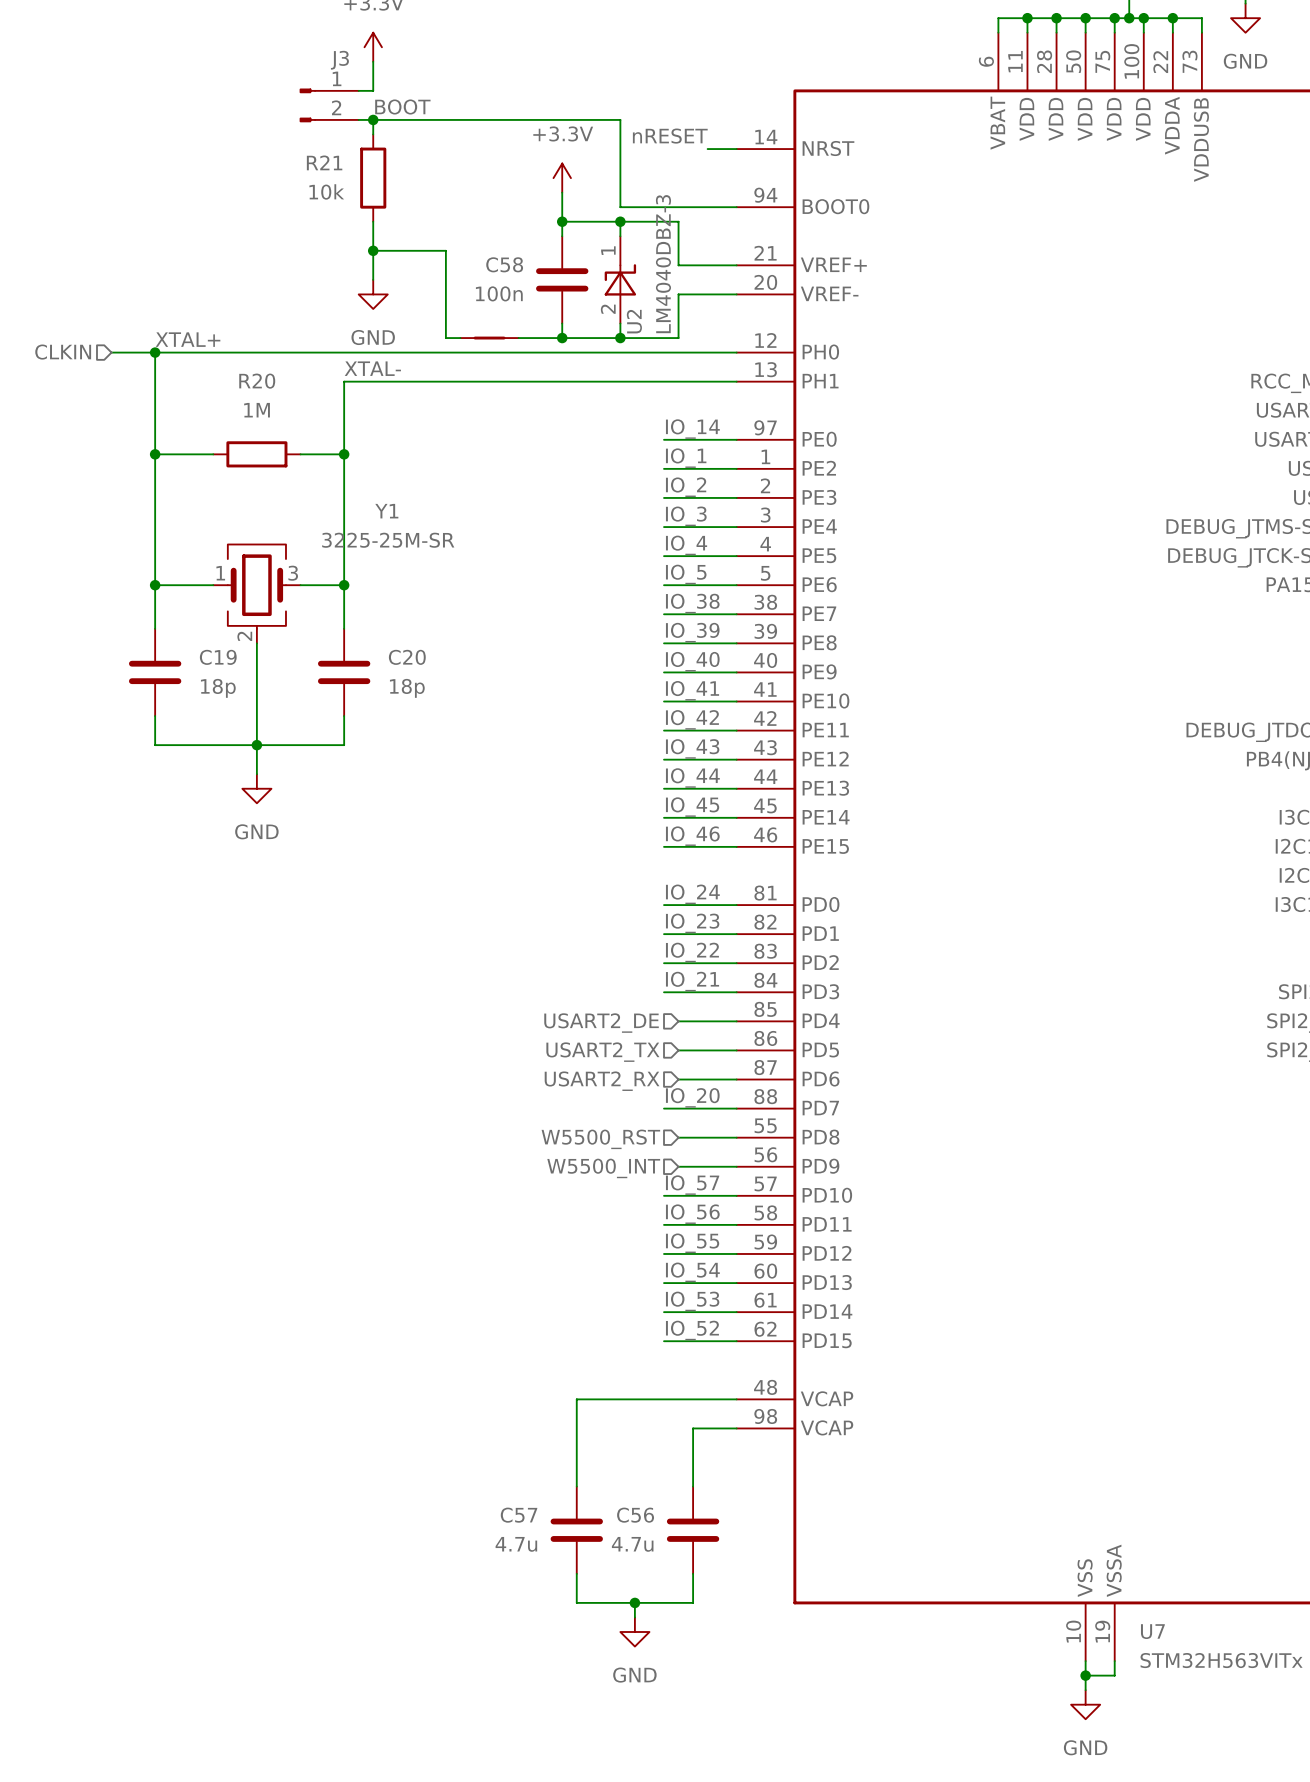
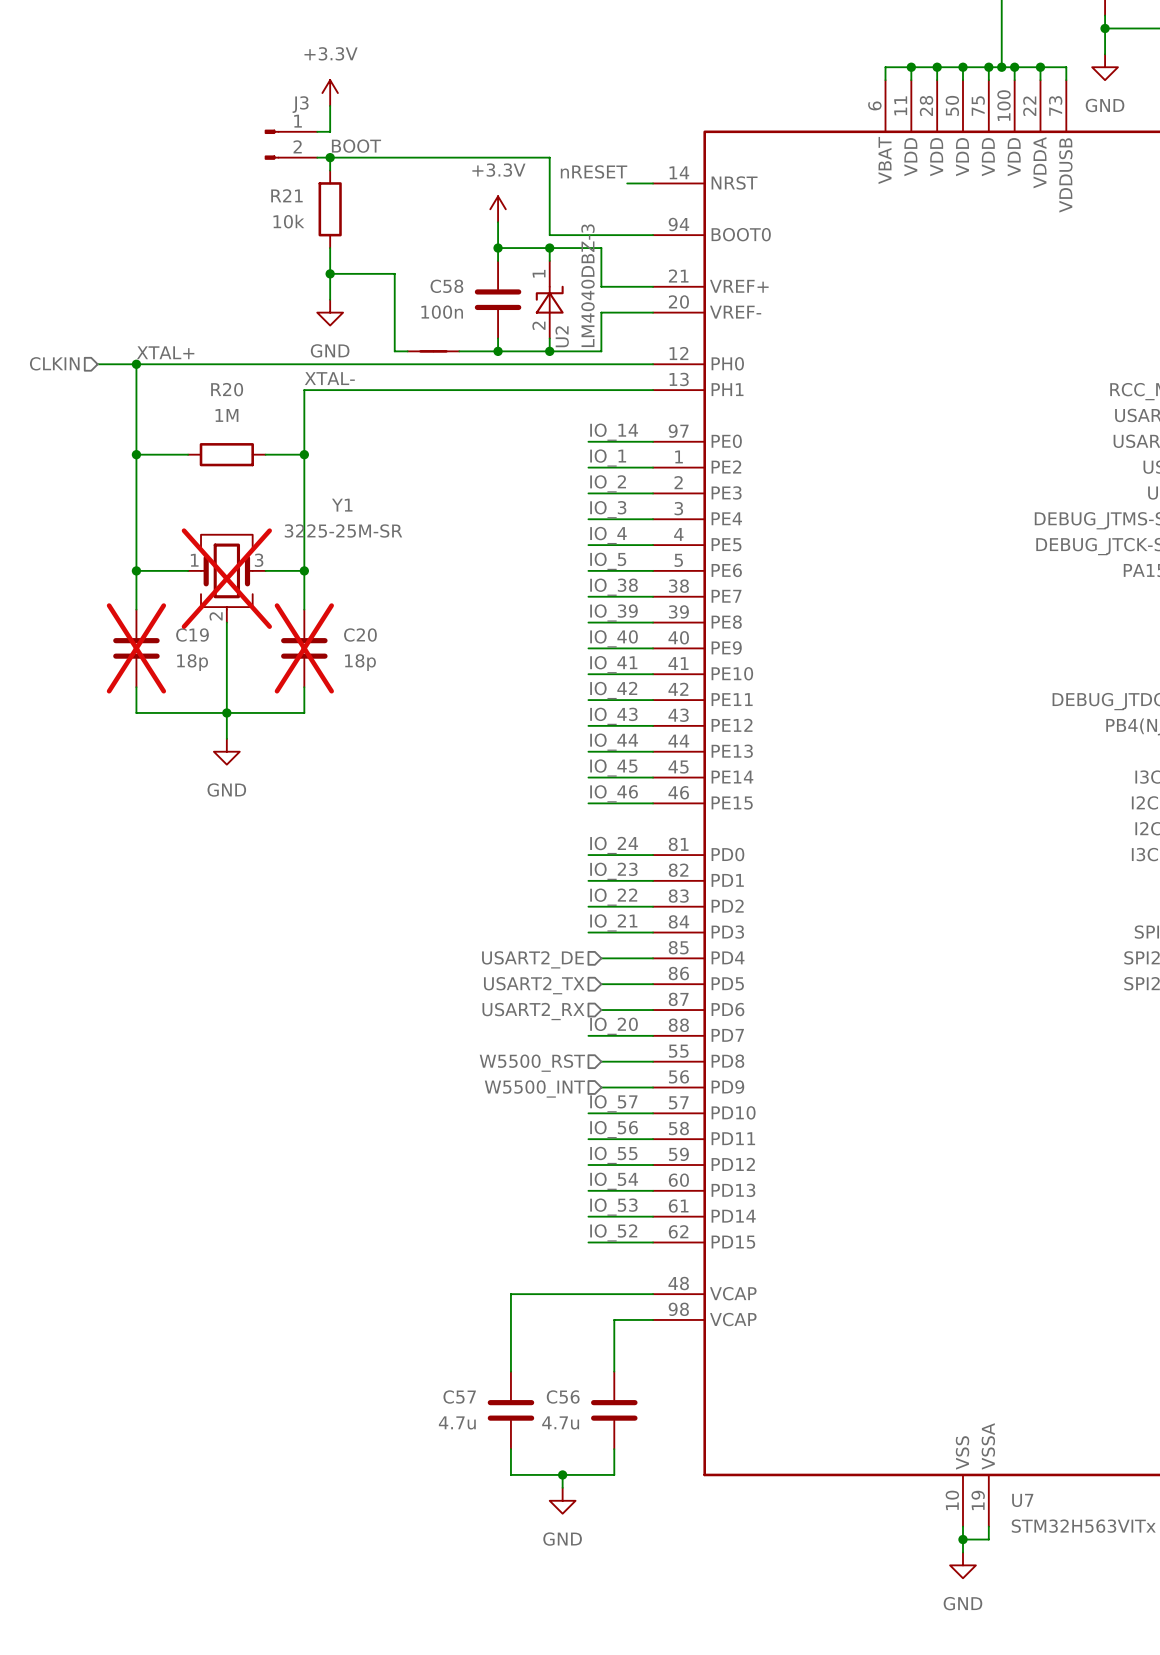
Y1 do-not-place cross: none -> (226, 578)
C19 do-not-place cross: none -> (136, 648)
C20 do-not-place cross: none -> (304, 648)

